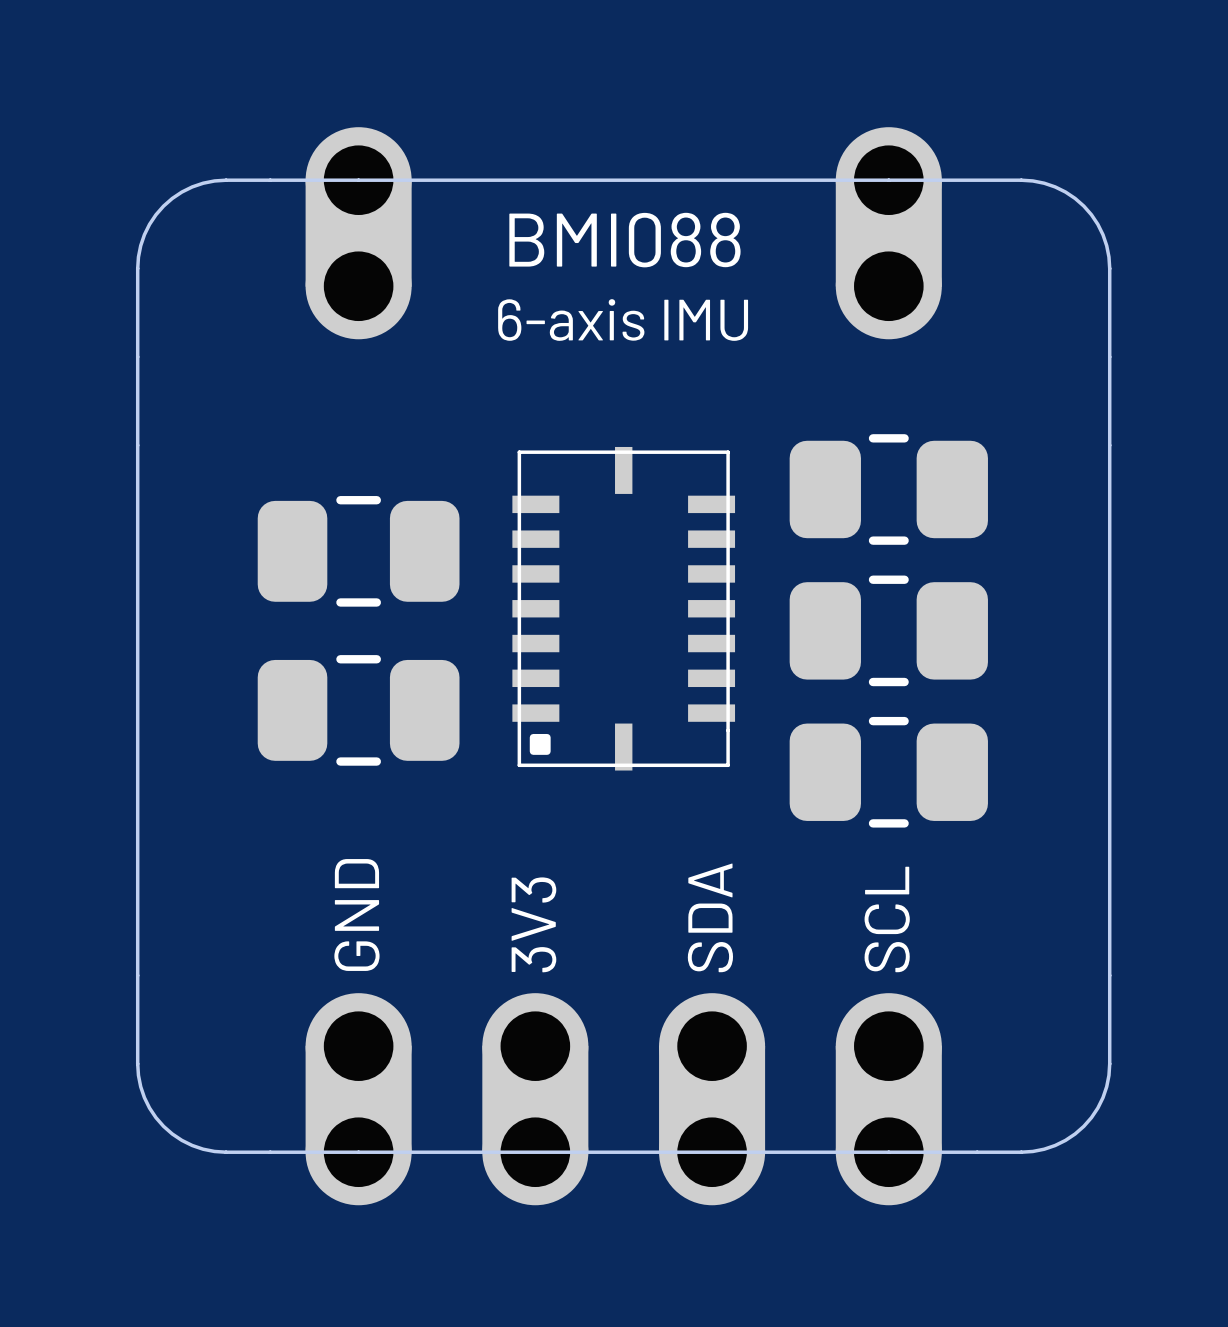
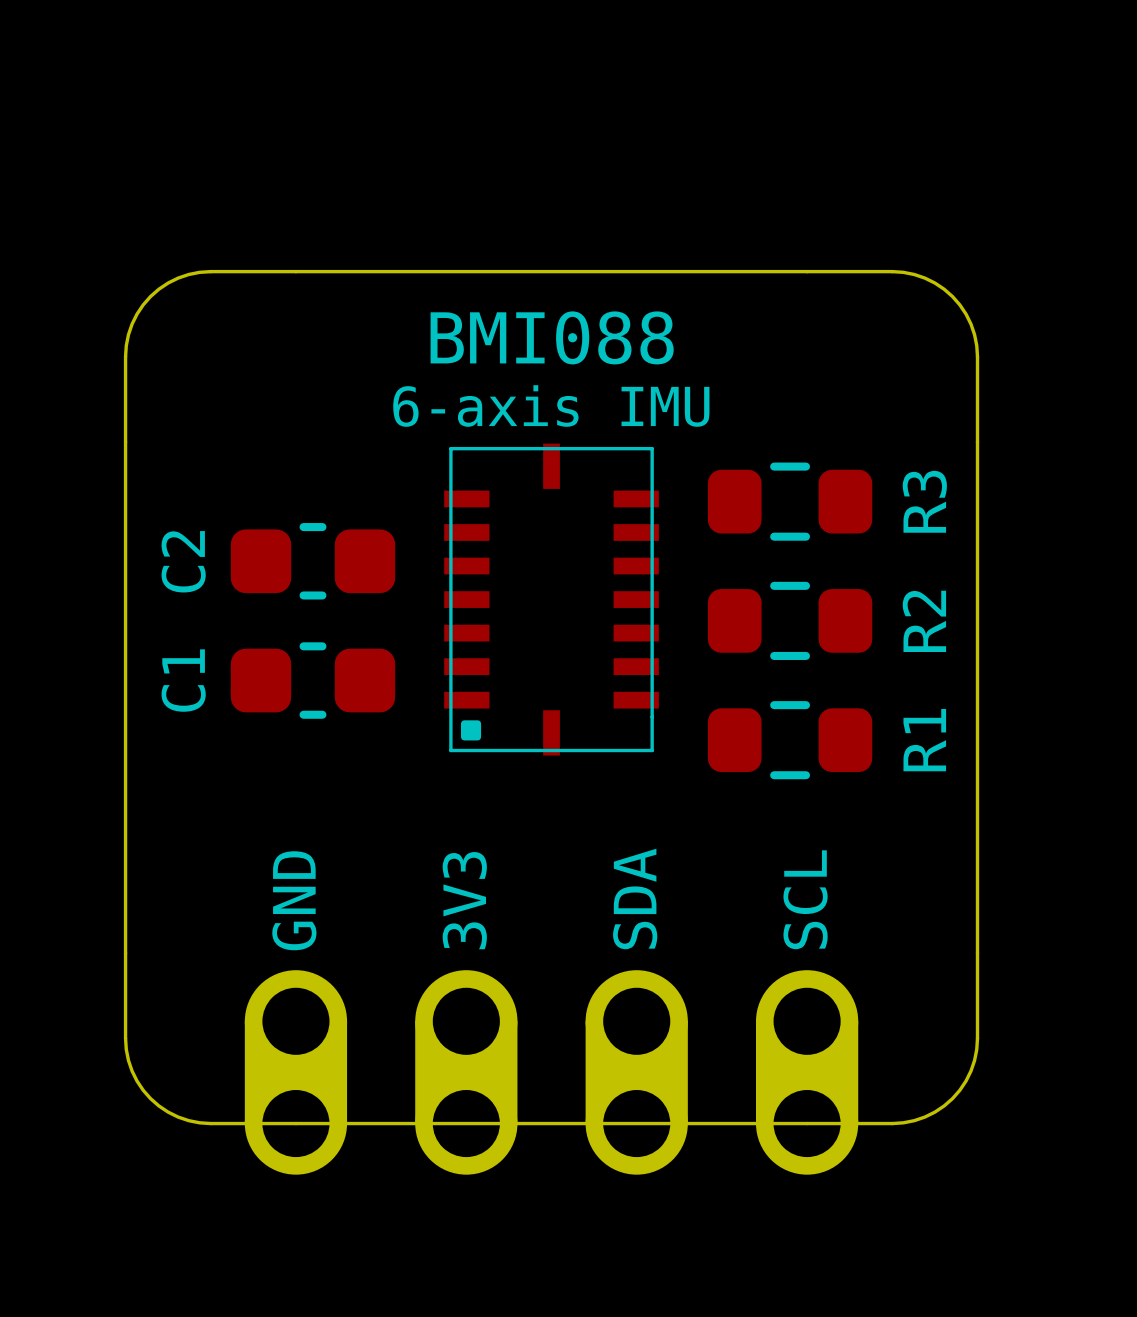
part: (358, 233) -> none
part: (888, 233) -> none
text position: BMI088 (624, 240) -> BMI088 (552, 337)
board edge: (137, 268) (140, 245) (144, 234) (149, 224) (163, 206) (181, 192) (192, 186) (214, 180) (1021, 180) (1032, 180) (1055, 186) (1065, 192) (1083, 206) (1091, 214) (1102, 234) (1106, 245) (1109, 268) (1108, 1075) (1106, 1086) (1097, 1108) (1083, 1126) (1065, 1140) (1055, 1145) (1032, 1151) (977, 1152) -> (210, 1123) (178, 1117) (158, 1105) (136, 1080) (126, 1049) (125, 356) (128, 334) (143, 304) (168, 283) (188, 274) (210, 271) (892, 271) (924, 278) (952, 296) (971, 324) (977, 356) (976, 1049) (971, 1070) (952, 1098) (924, 1117) (892, 1123)
board edge: (137, 268) (138, 1075) (140, 1086) (149, 1108) (163, 1126) (181, 1140) (203, 1149) (214, 1151) (270, 1152) -> none
text position: 6-axis IMU (623, 320) -> 6-axis IMU (551, 406)
part: (888, 489) -> none
R3: none -> (790, 501)
part: (358, 551) -> none
C2: none -> (312, 561)
R2: none -> (790, 620)
part: (888, 630) -> none
C1: none -> (312, 680)
part: (358, 710) -> none
R1: none -> (790, 740)
part: (888, 772) -> none

